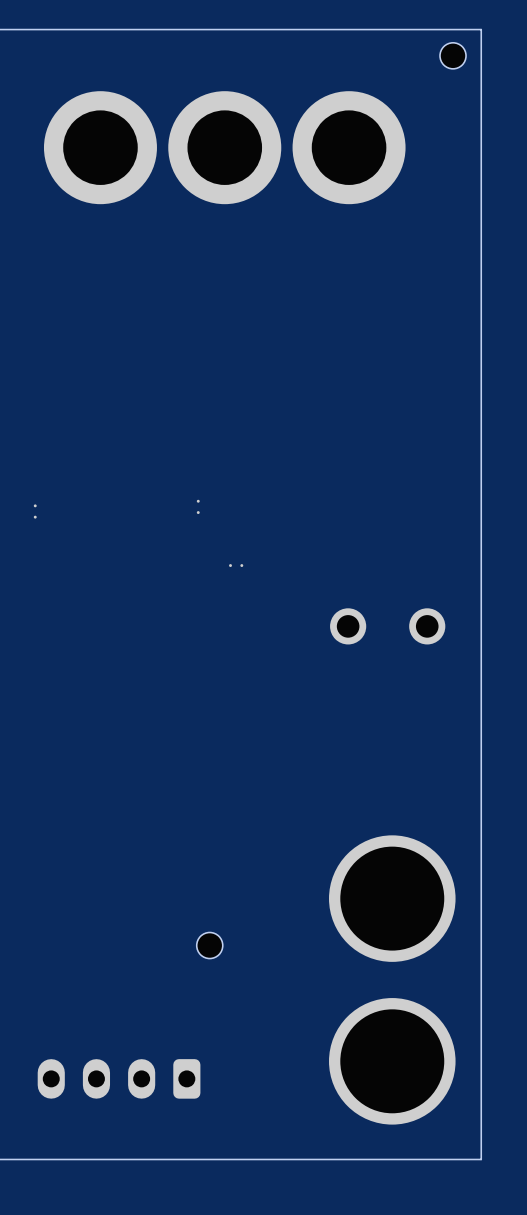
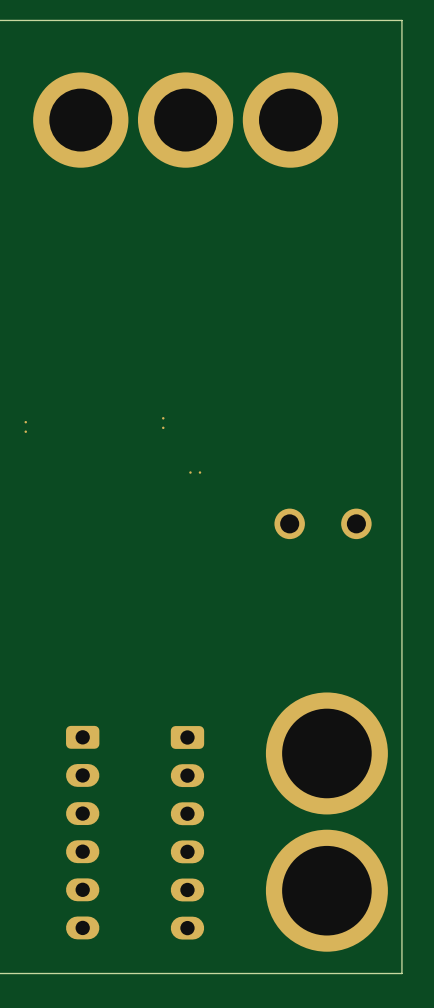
part: (453, 55) -> none
part footprint: [329, 835, 456, 1125] -> [265, 692, 388, 952]
part: (209, 945) -> none
part: none -> (82, 832)
part: none -> (187, 832)
part: (119, 1078) -> none

